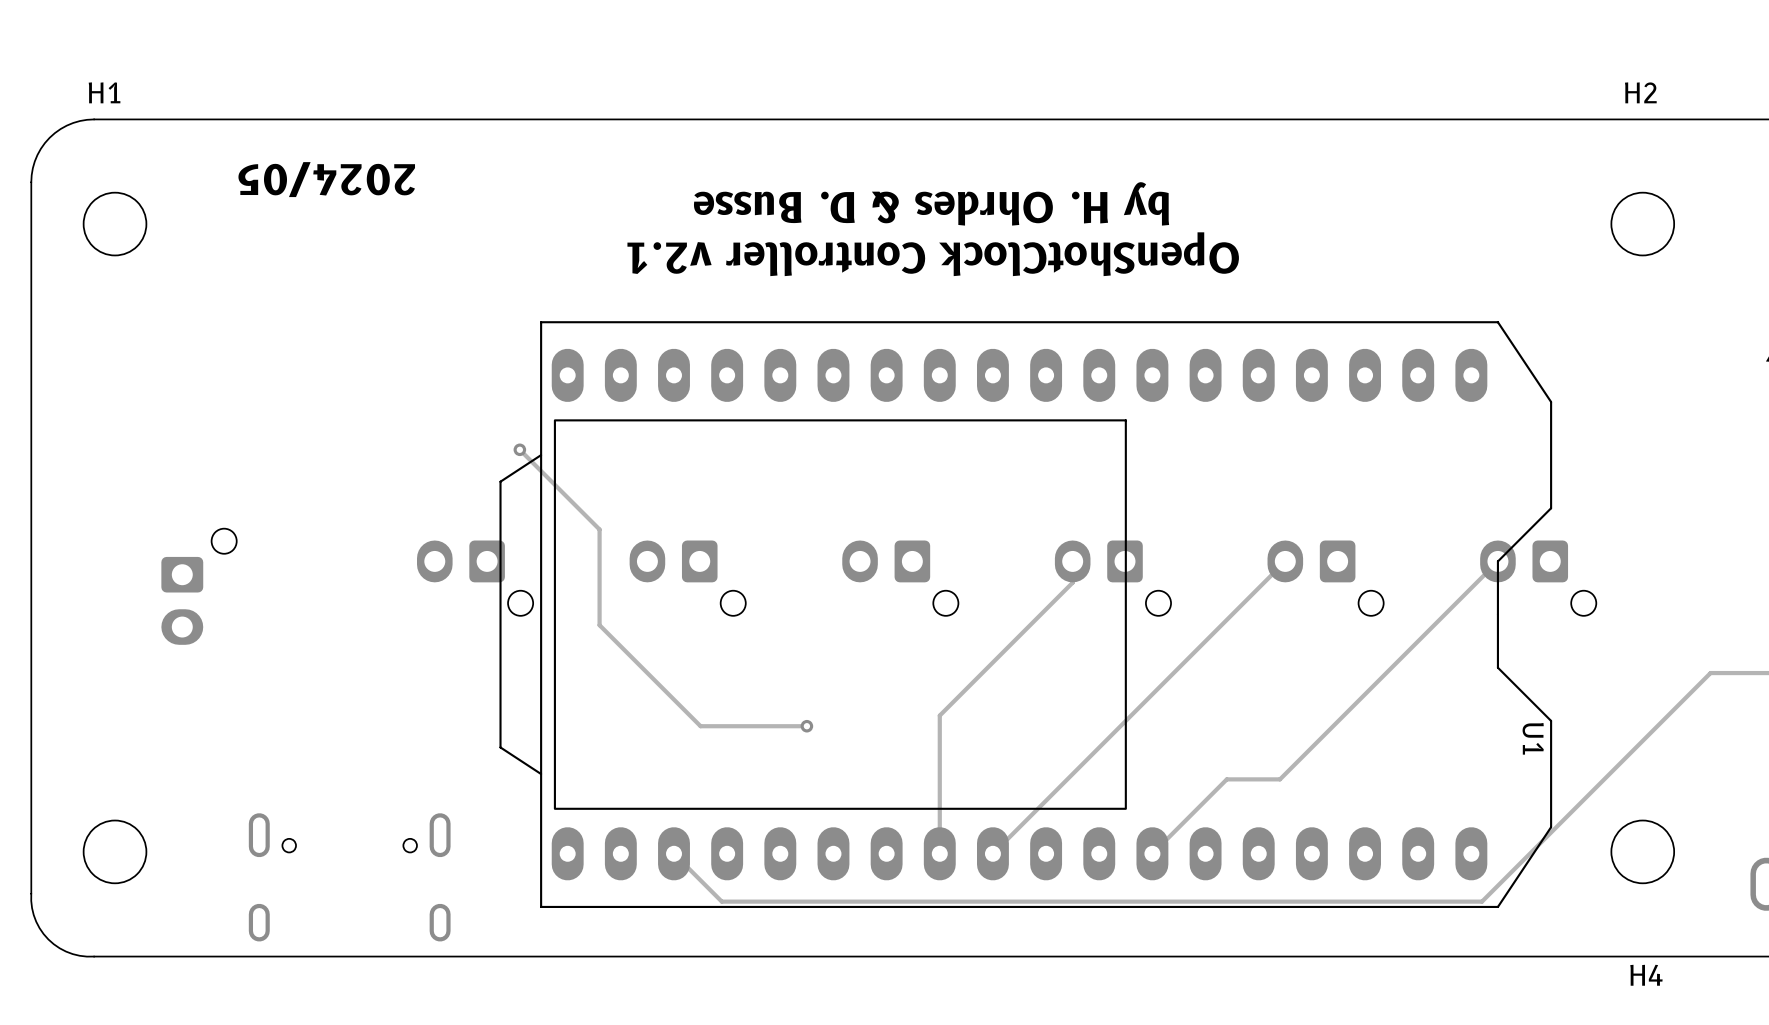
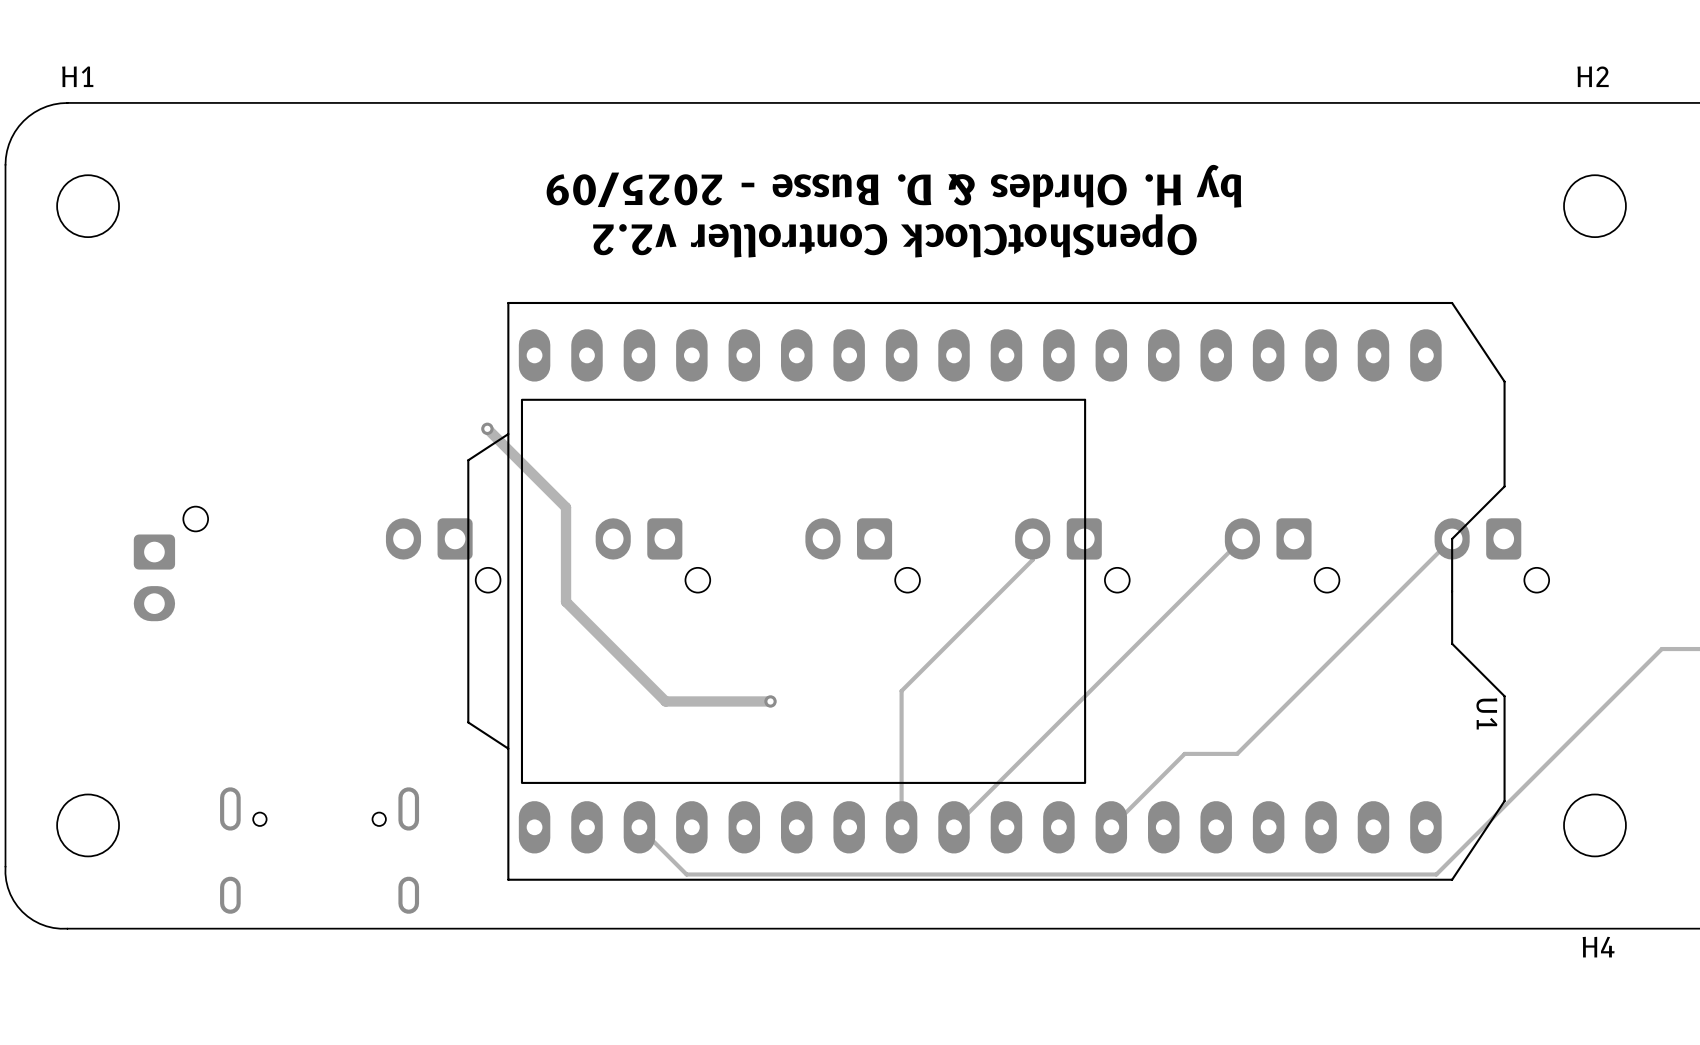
text: 2024/05 (326, 179) -> none
text: by H. Ohrdes & D. Busse (931, 203) -> by H. Ohrdes & D. Busse - 2025/09 (894, 186)
text: OpenShotClock Controller v2.1 (933, 254) -> OpenShotClock Controller v2.2 (894, 235)
track width: thin (519, 449) (599, 529) (599, 625) (700, 726) (806, 726) -> thick (487, 428) (566, 507) (566, 601) (665, 701) (770, 701)

